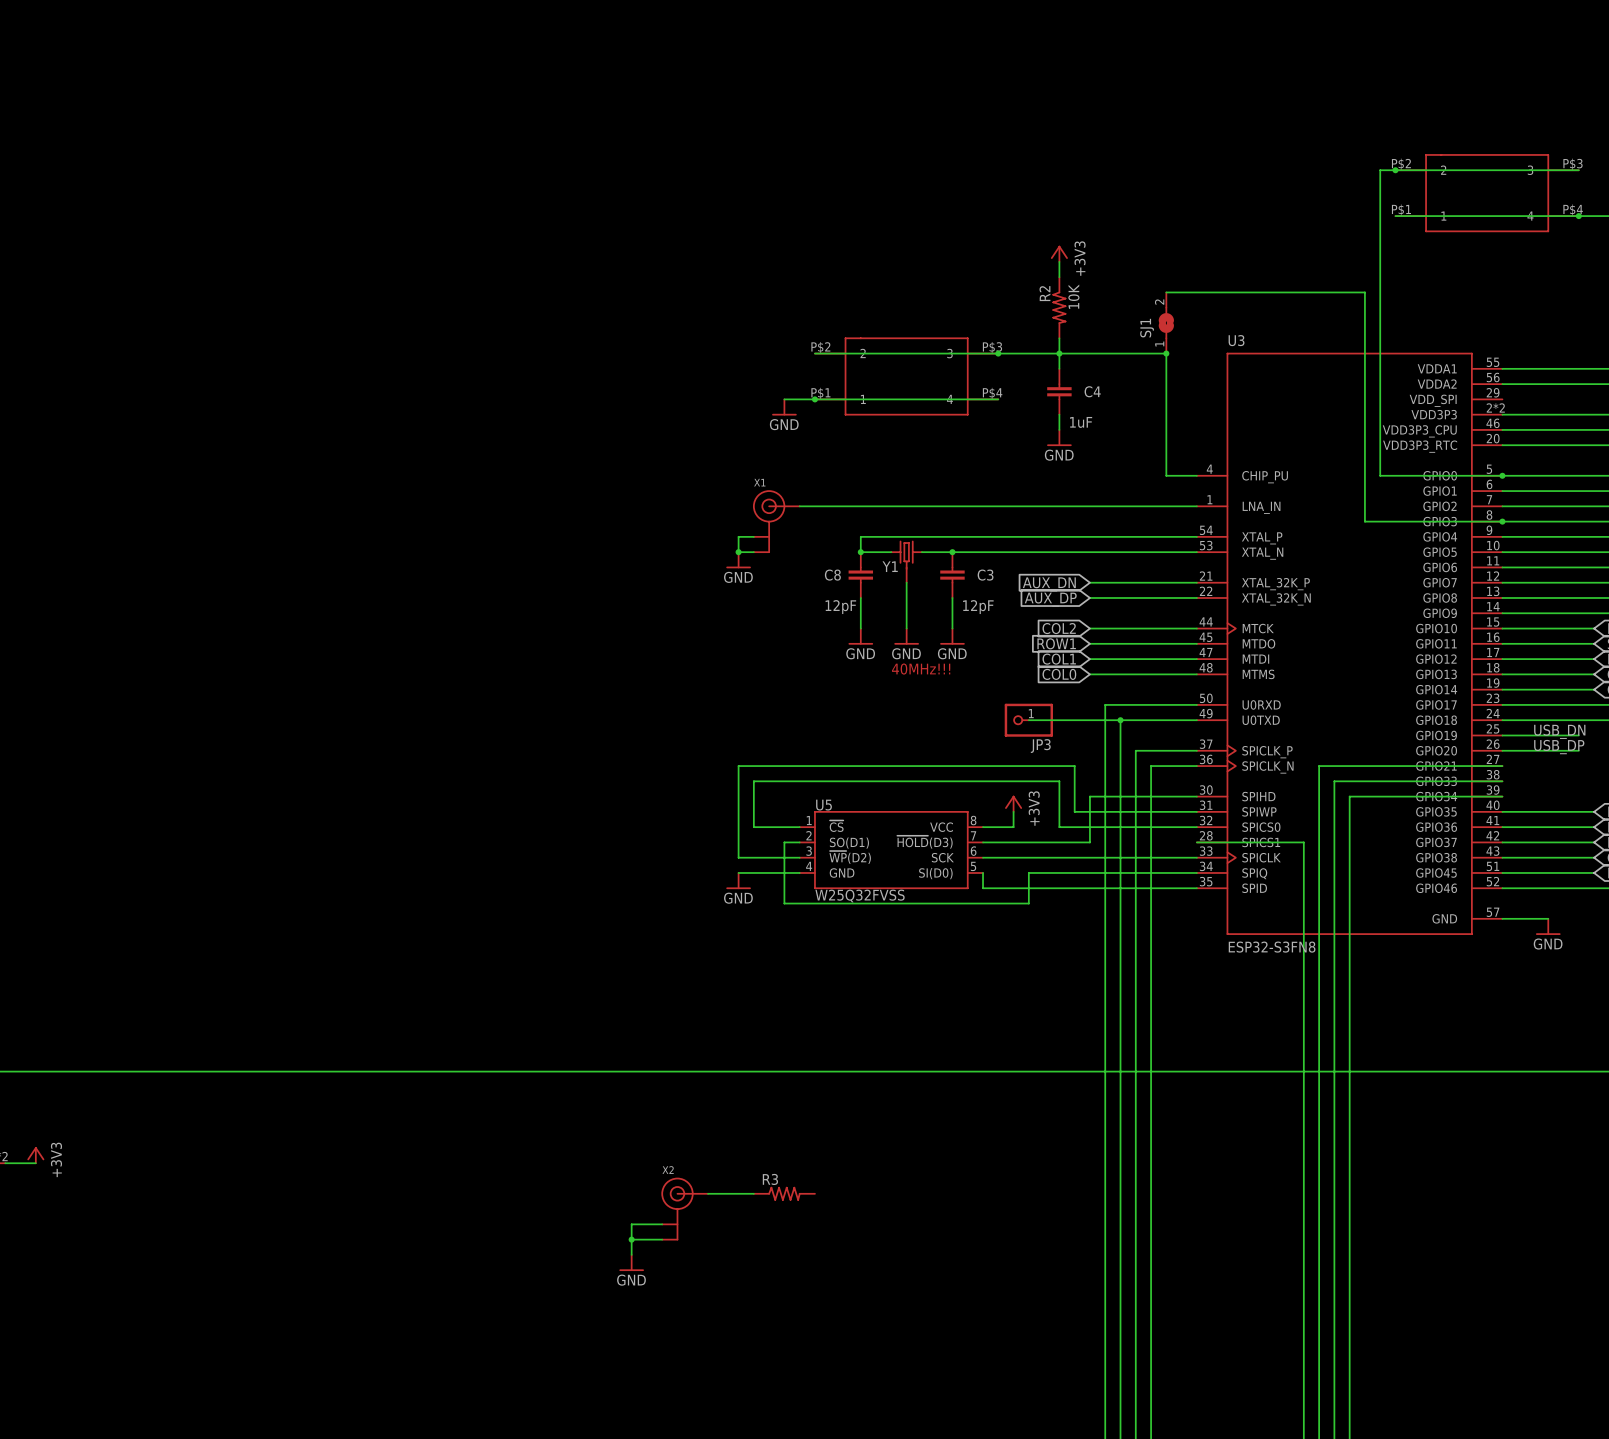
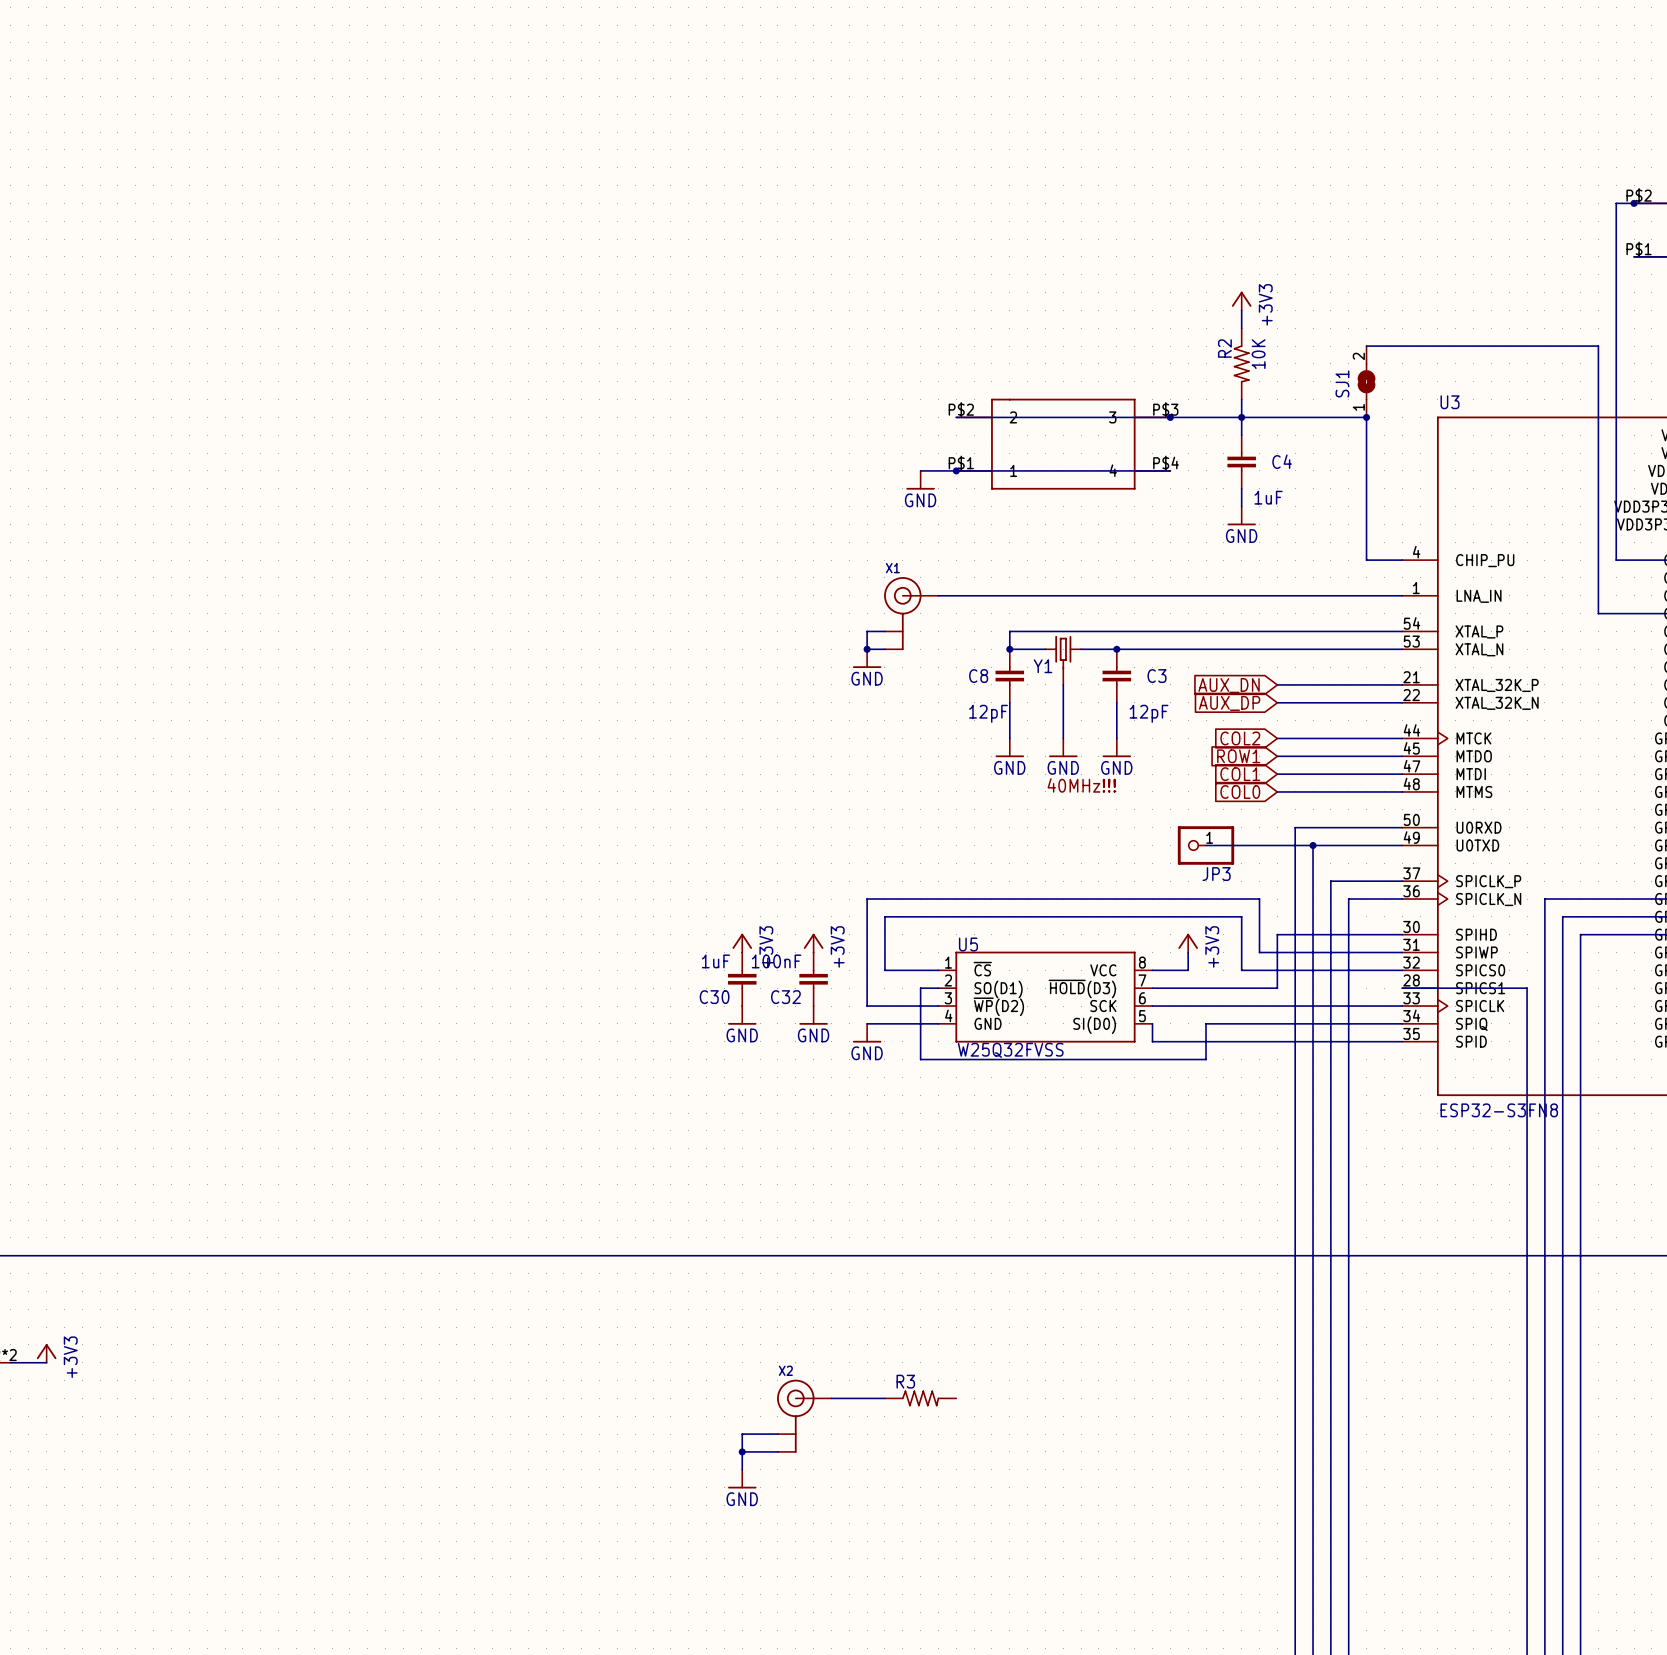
power symbol: none -> +3V3 (742, 943)
power symbol: none -> +3V3 (813, 943)
C30: none -> 1uF (742, 979)
C32: none -> 100nF (813, 979)
power symbol: none -> GND (742, 1015)
power symbol: none -> GND (813, 1015)

